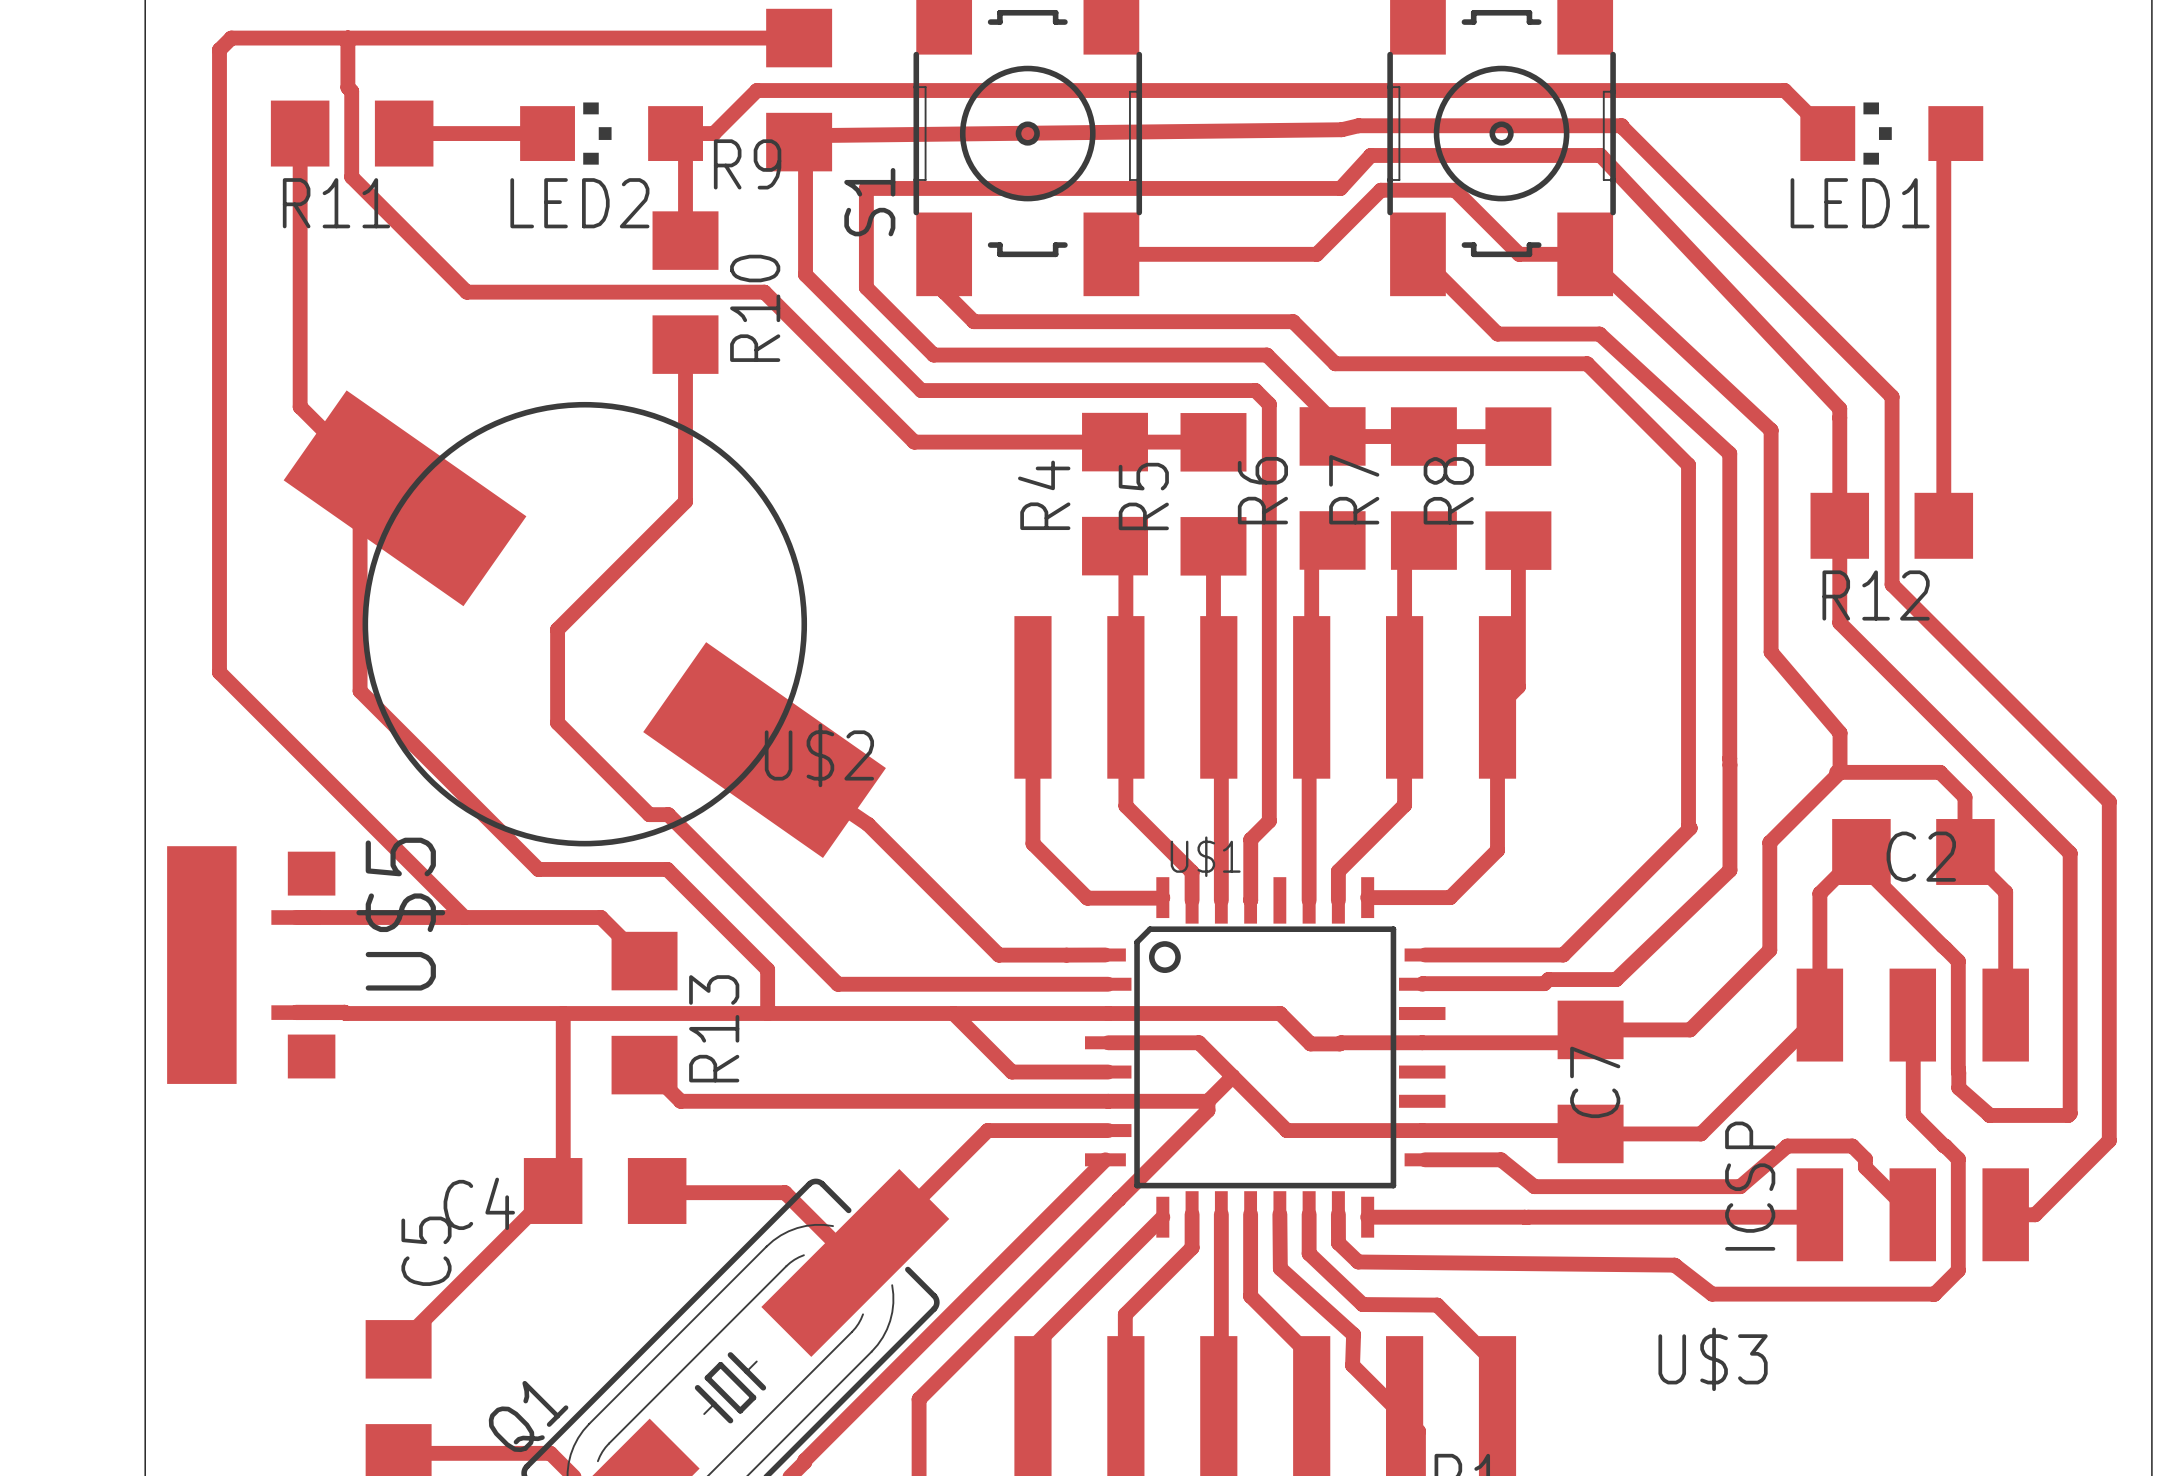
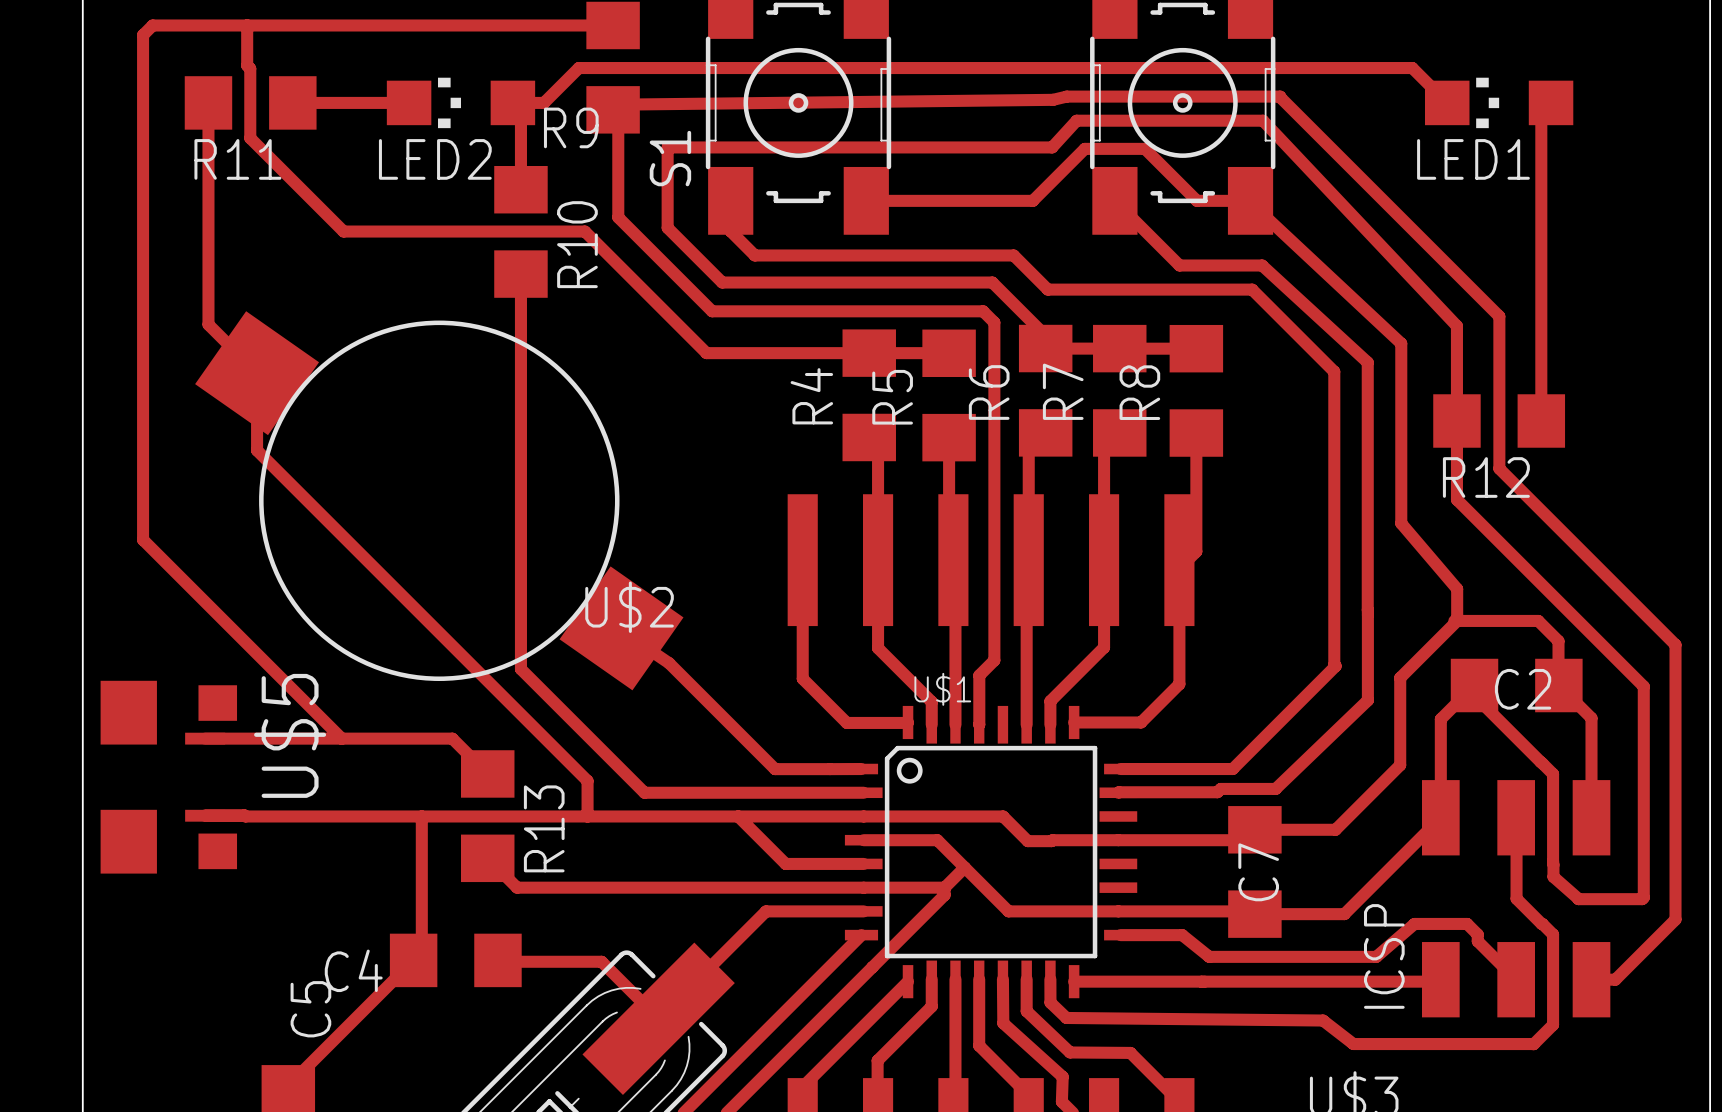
part footprint: [283, 390, 886, 858] -> [195, 311, 684, 691]
track: (685, 501) (557, 629) (557, 722) (649, 814) (668, 814) (685, 831) -> (520, 401) (520, 669)
track: (360, 562) (360, 691) (538, 869) (667, 869) -> (257, 450) (506, 699)
U$5 footprint: [167, 846, 336, 1084] -> [100, 680, 238, 874]

